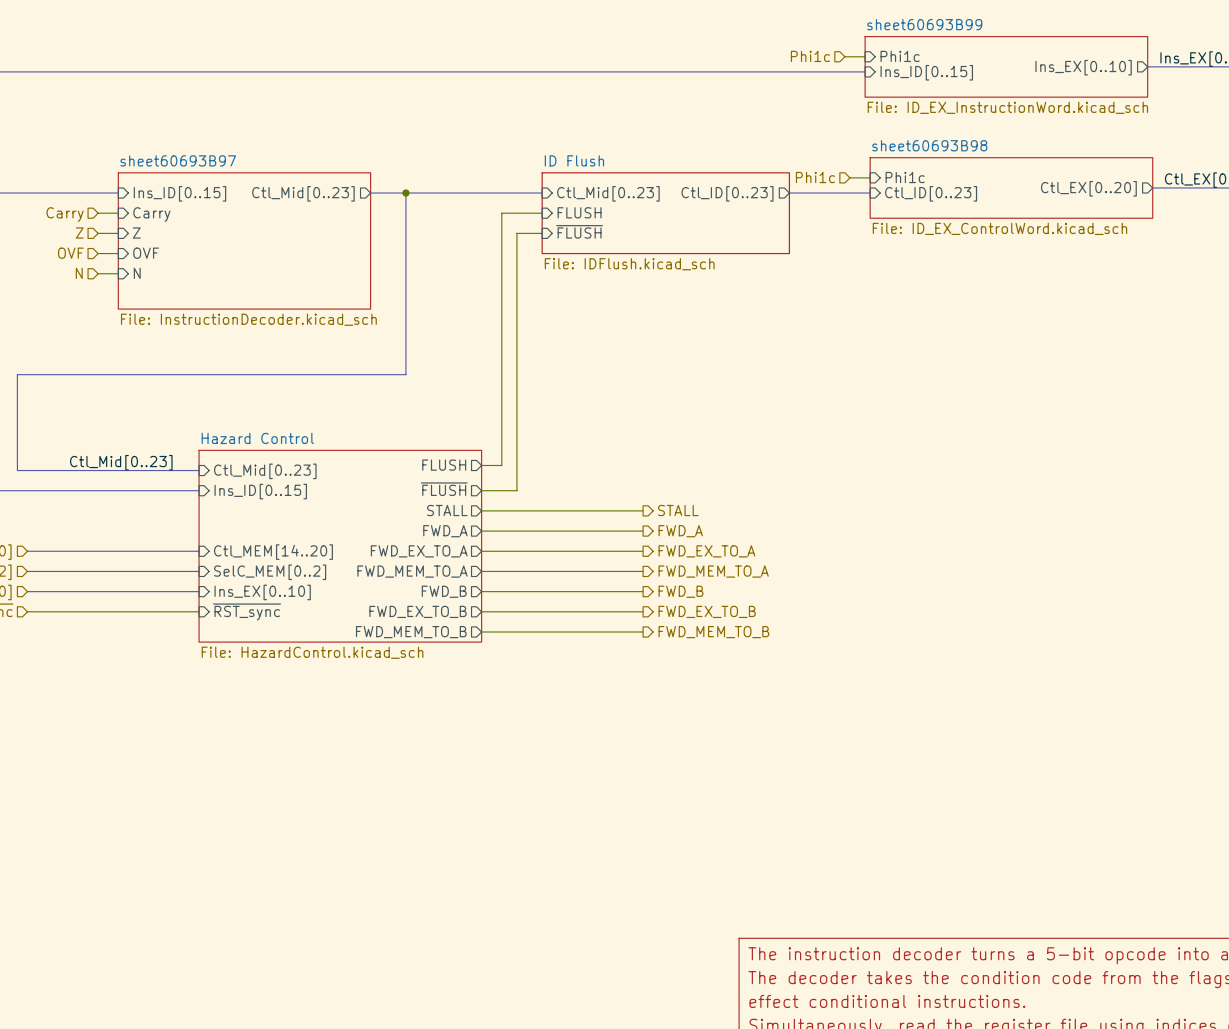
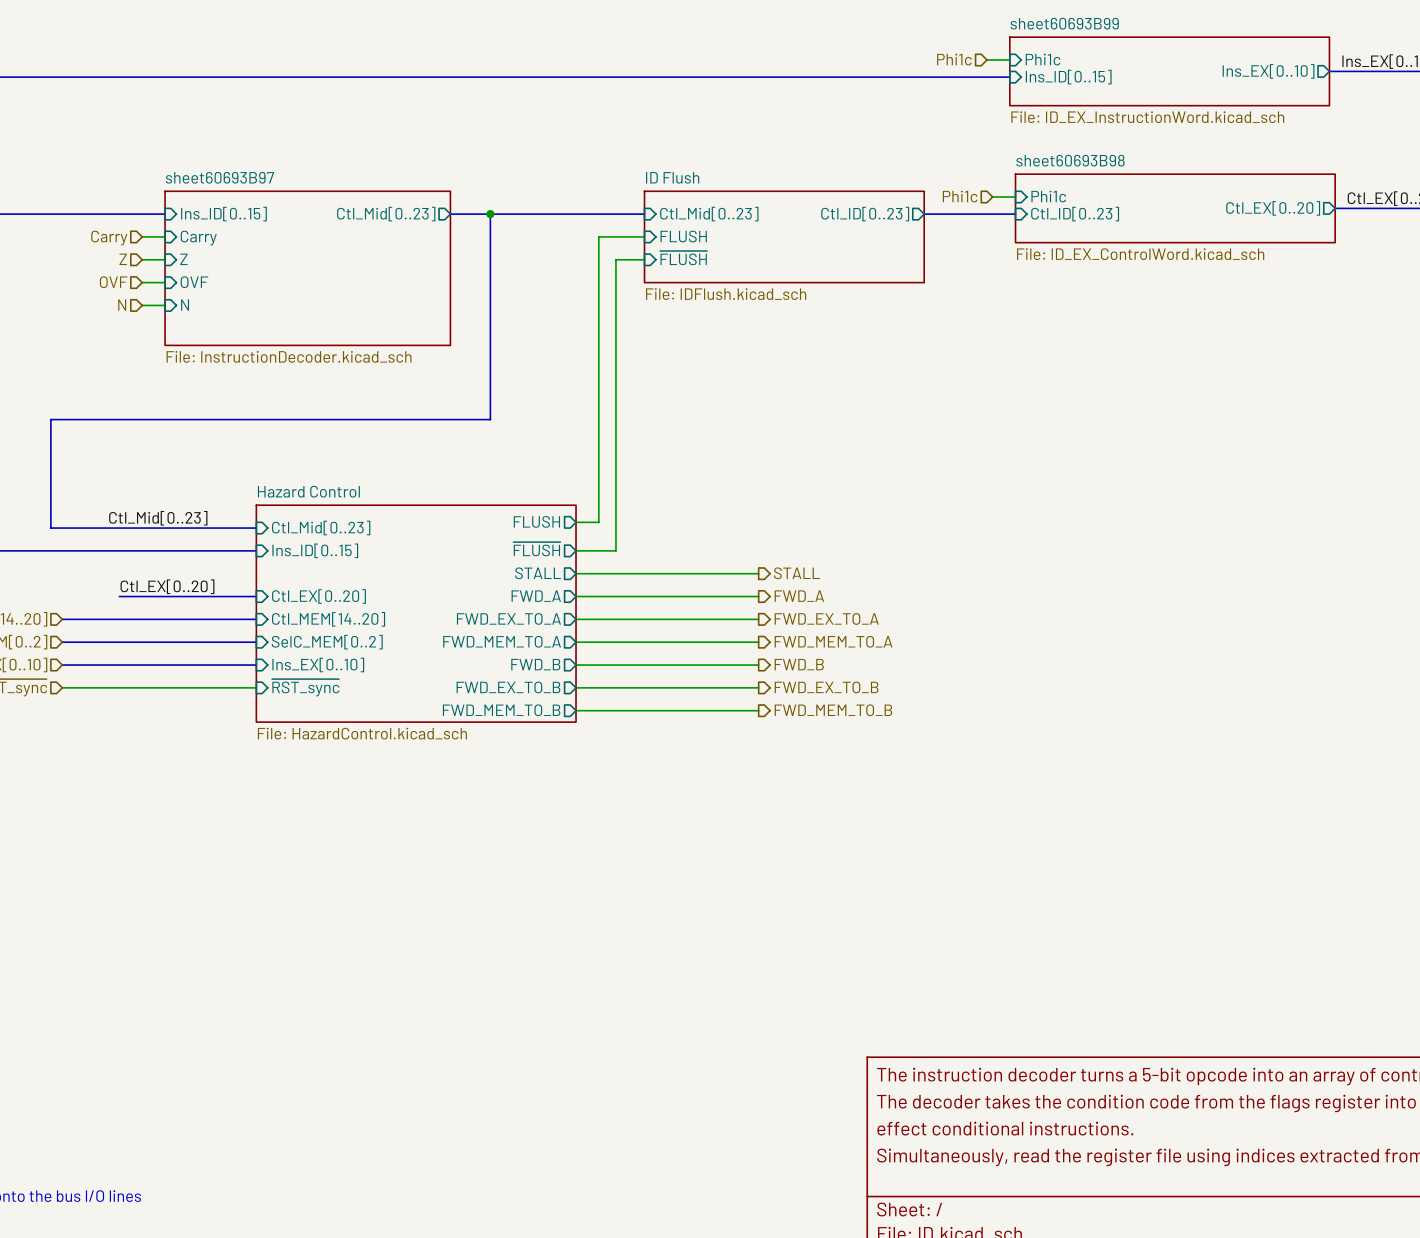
label: none -> Ctl_EX[0..20] (167, 586)
bus: none -> (119, 596) (256, 596)
sheet pin: none -> Ctl_EX[0..20] (318, 596)

